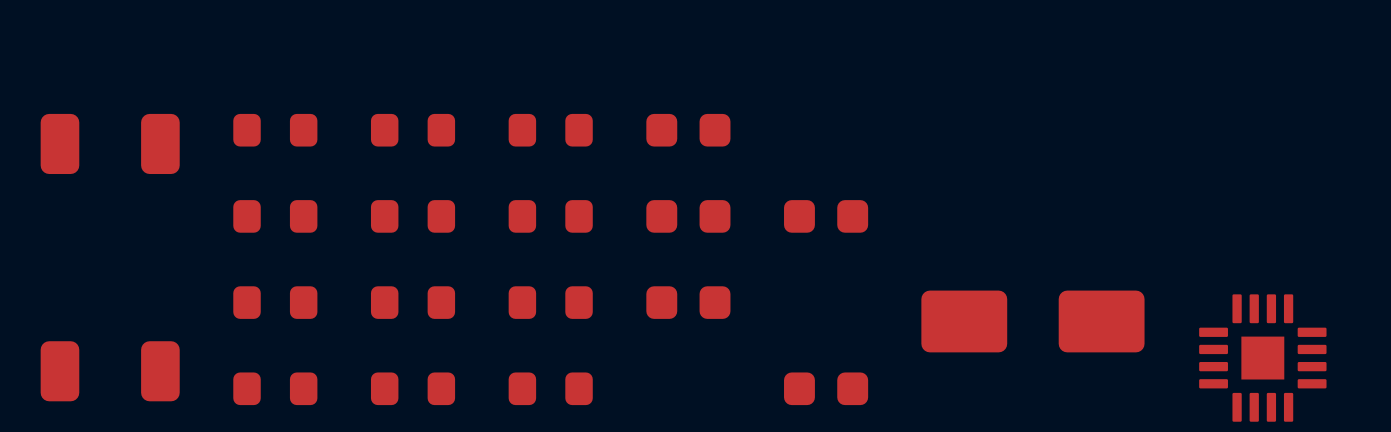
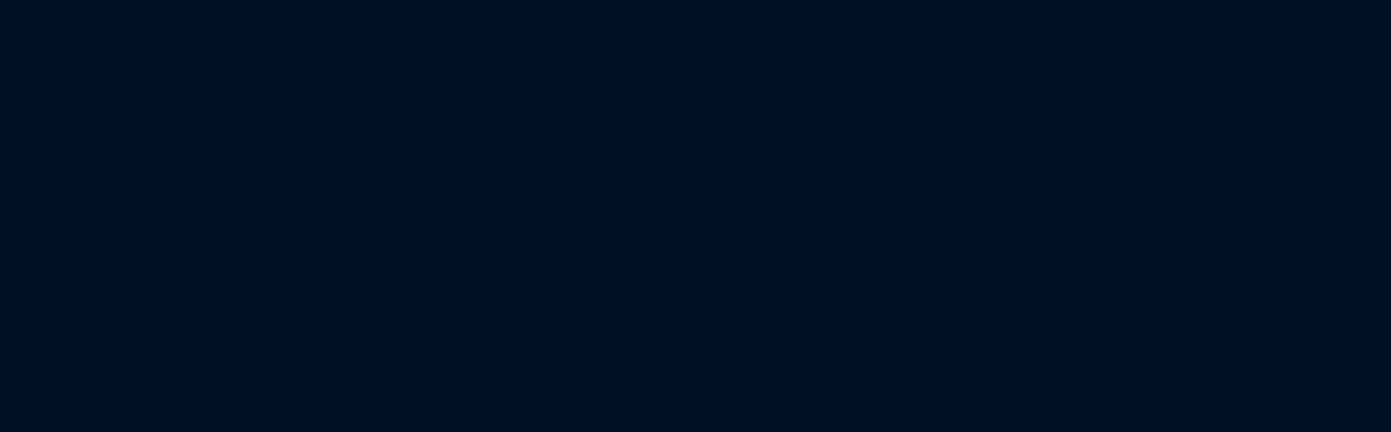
part: (275, 130) -> none
part: (413, 130) -> none
part: (550, 130) -> none
part: (688, 130) -> none
part: (110, 143) -> none
part: (275, 216) -> none
part: (413, 216) -> none
part: (550, 216) -> none
part: (688, 216) -> none
part: (826, 216) -> none
part: (275, 302) -> none
part: (413, 302) -> none
part: (550, 302) -> none
part: (688, 302) -> none
part: (1032, 321) -> none
part: (1262, 358) -> none
part: (110, 371) -> none
part: (275, 388) -> none
part: (413, 388) -> none
part: (550, 388) -> none
part: (826, 388) -> none

